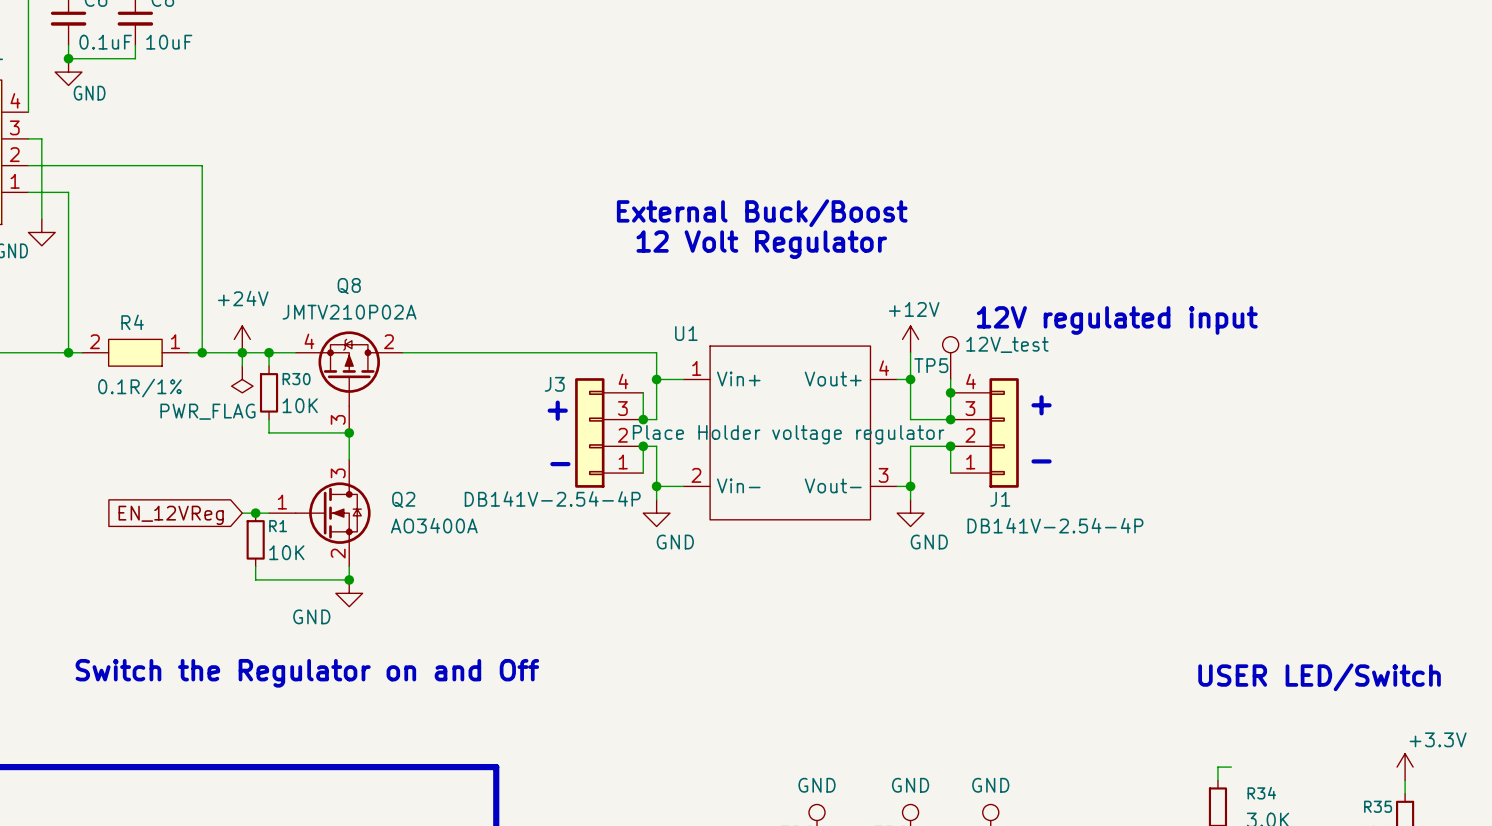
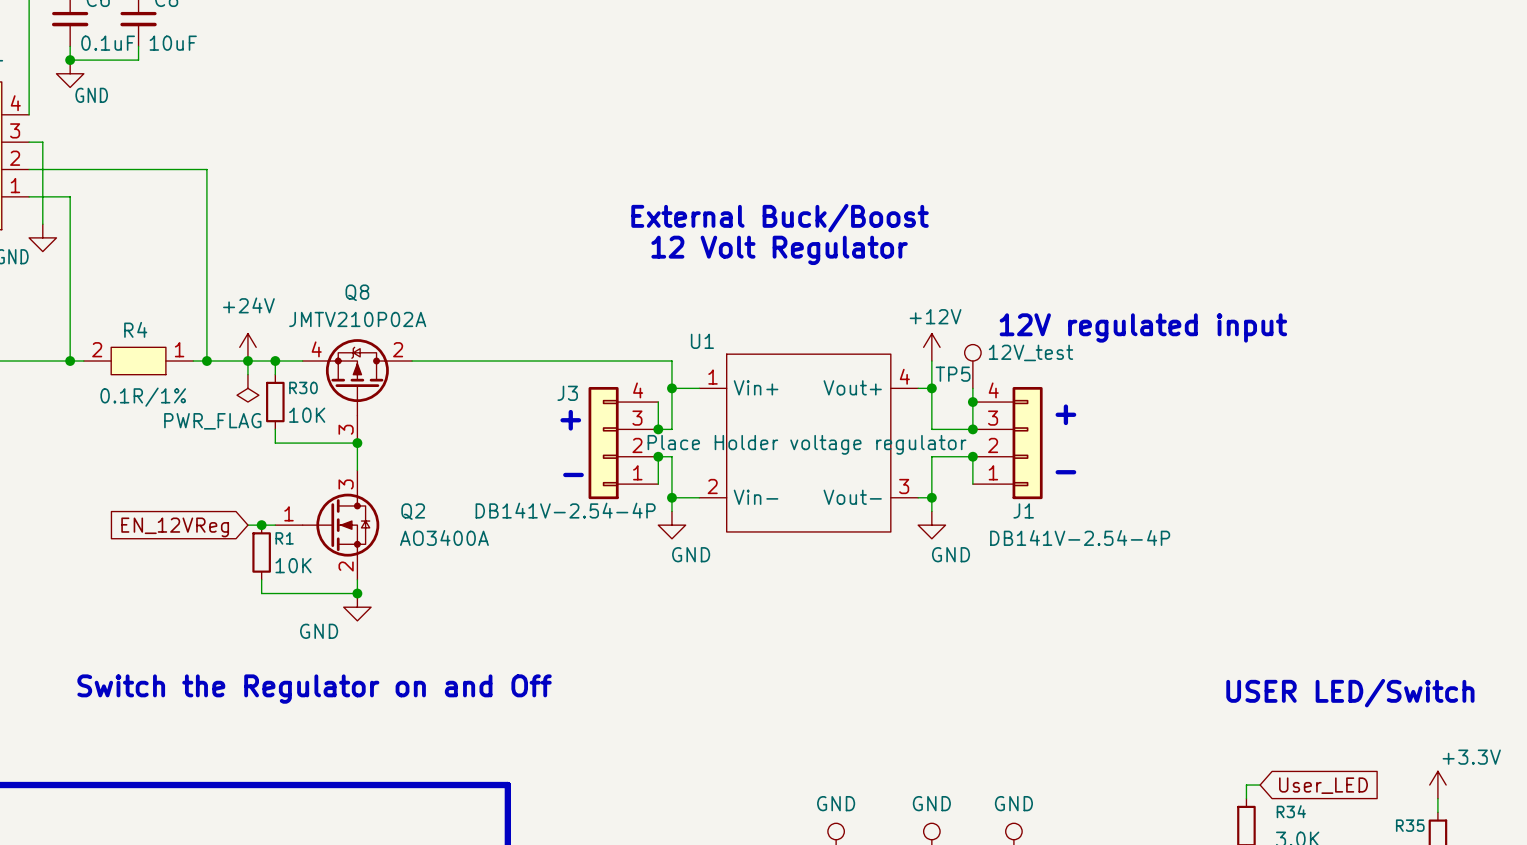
global label: none -> User_LED (1323, 785)

